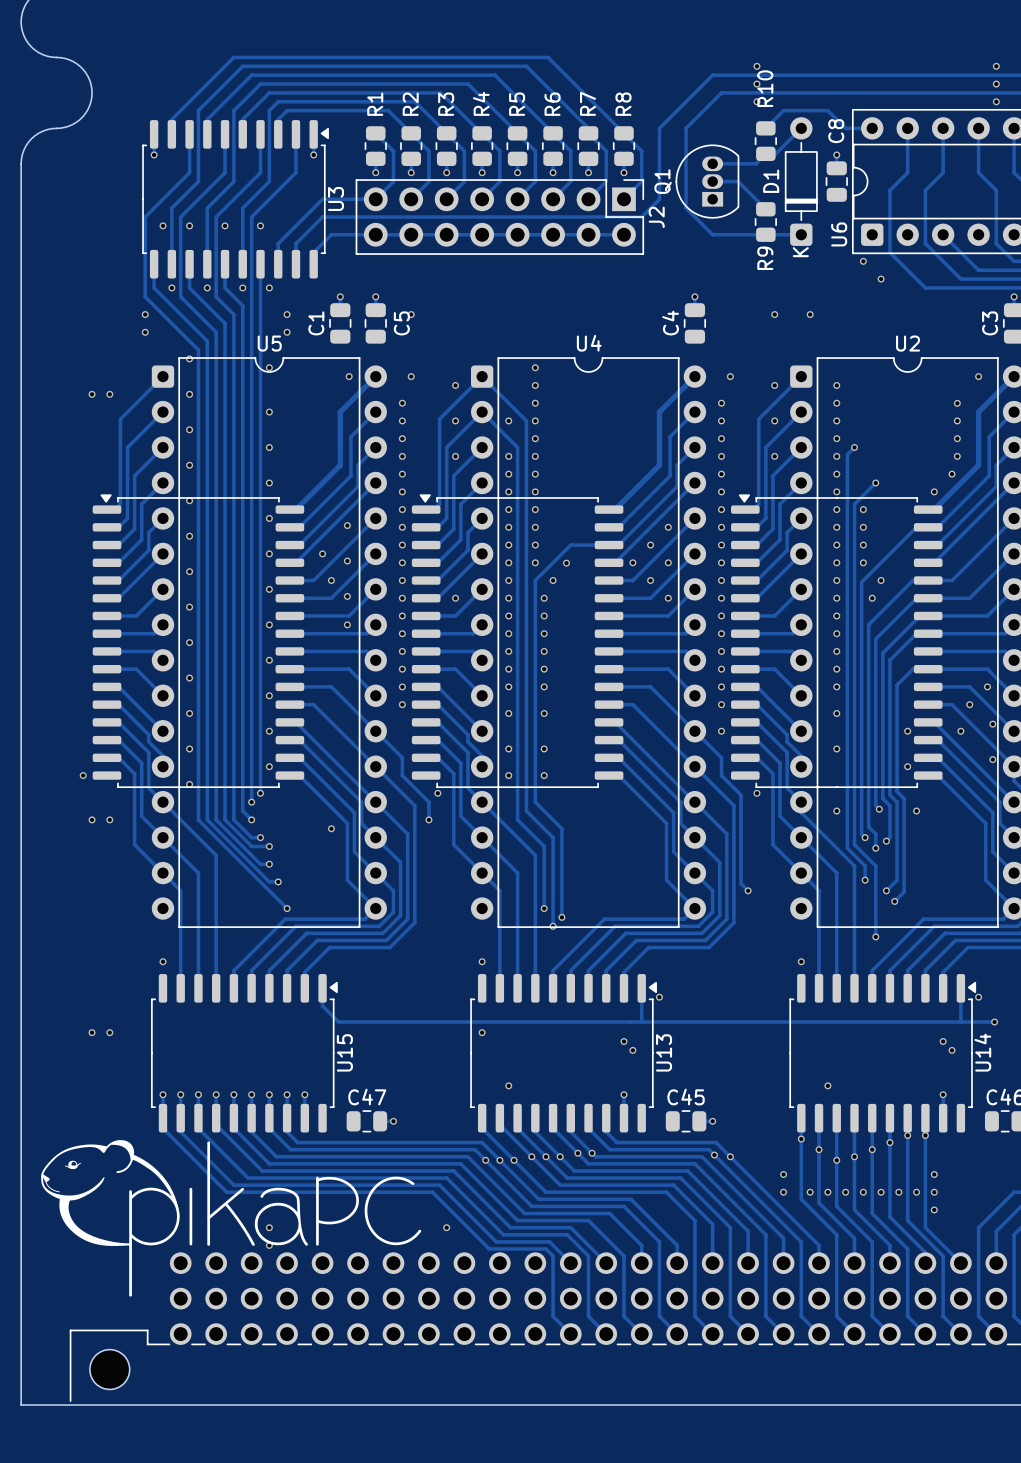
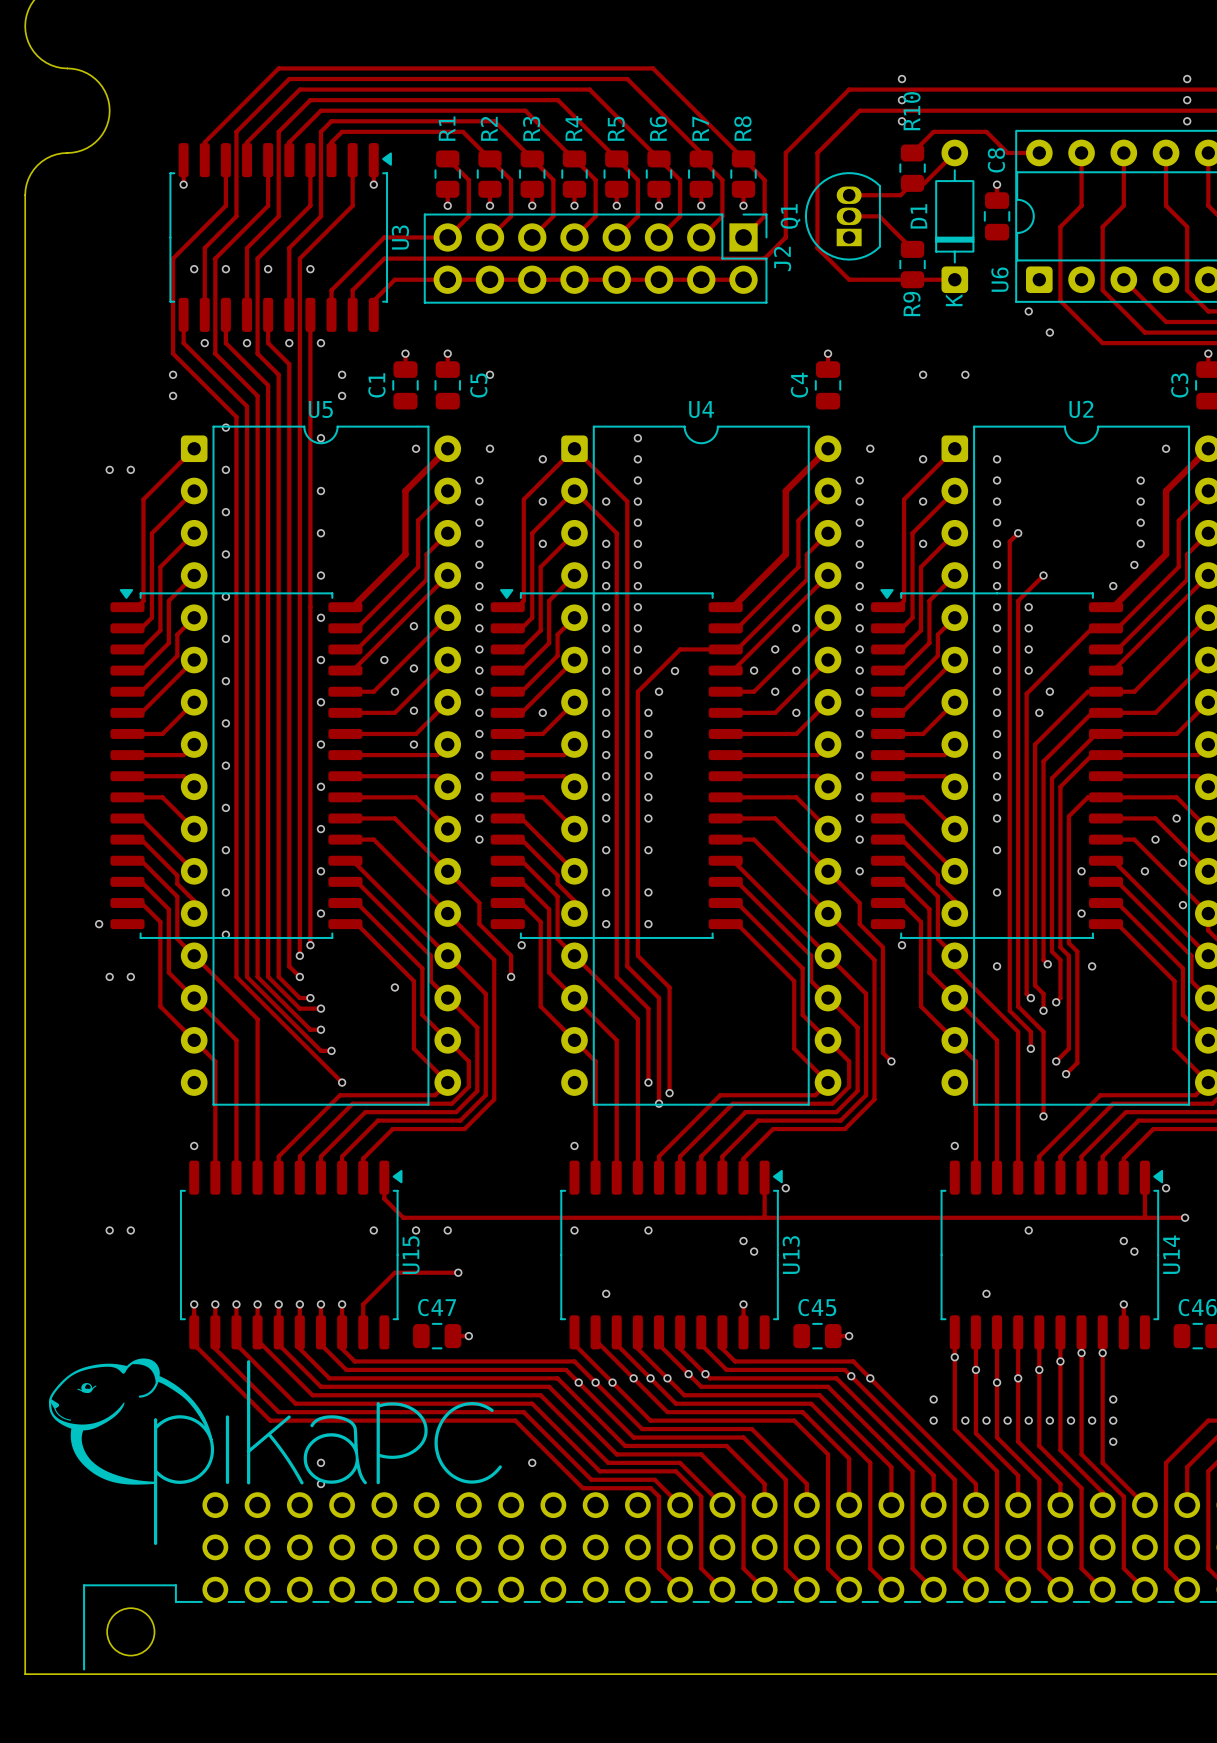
via: none -> (373, 1230)
via: none -> (416, 1230)
via: none -> (447, 1230)
via: none -> (648, 1230)
via: none -> (1028, 1230)
track: none -> (458, 1272) (394, 1272) (363, 1304)
via: none -> (458, 1272)
via: (304, 1094) -> none

